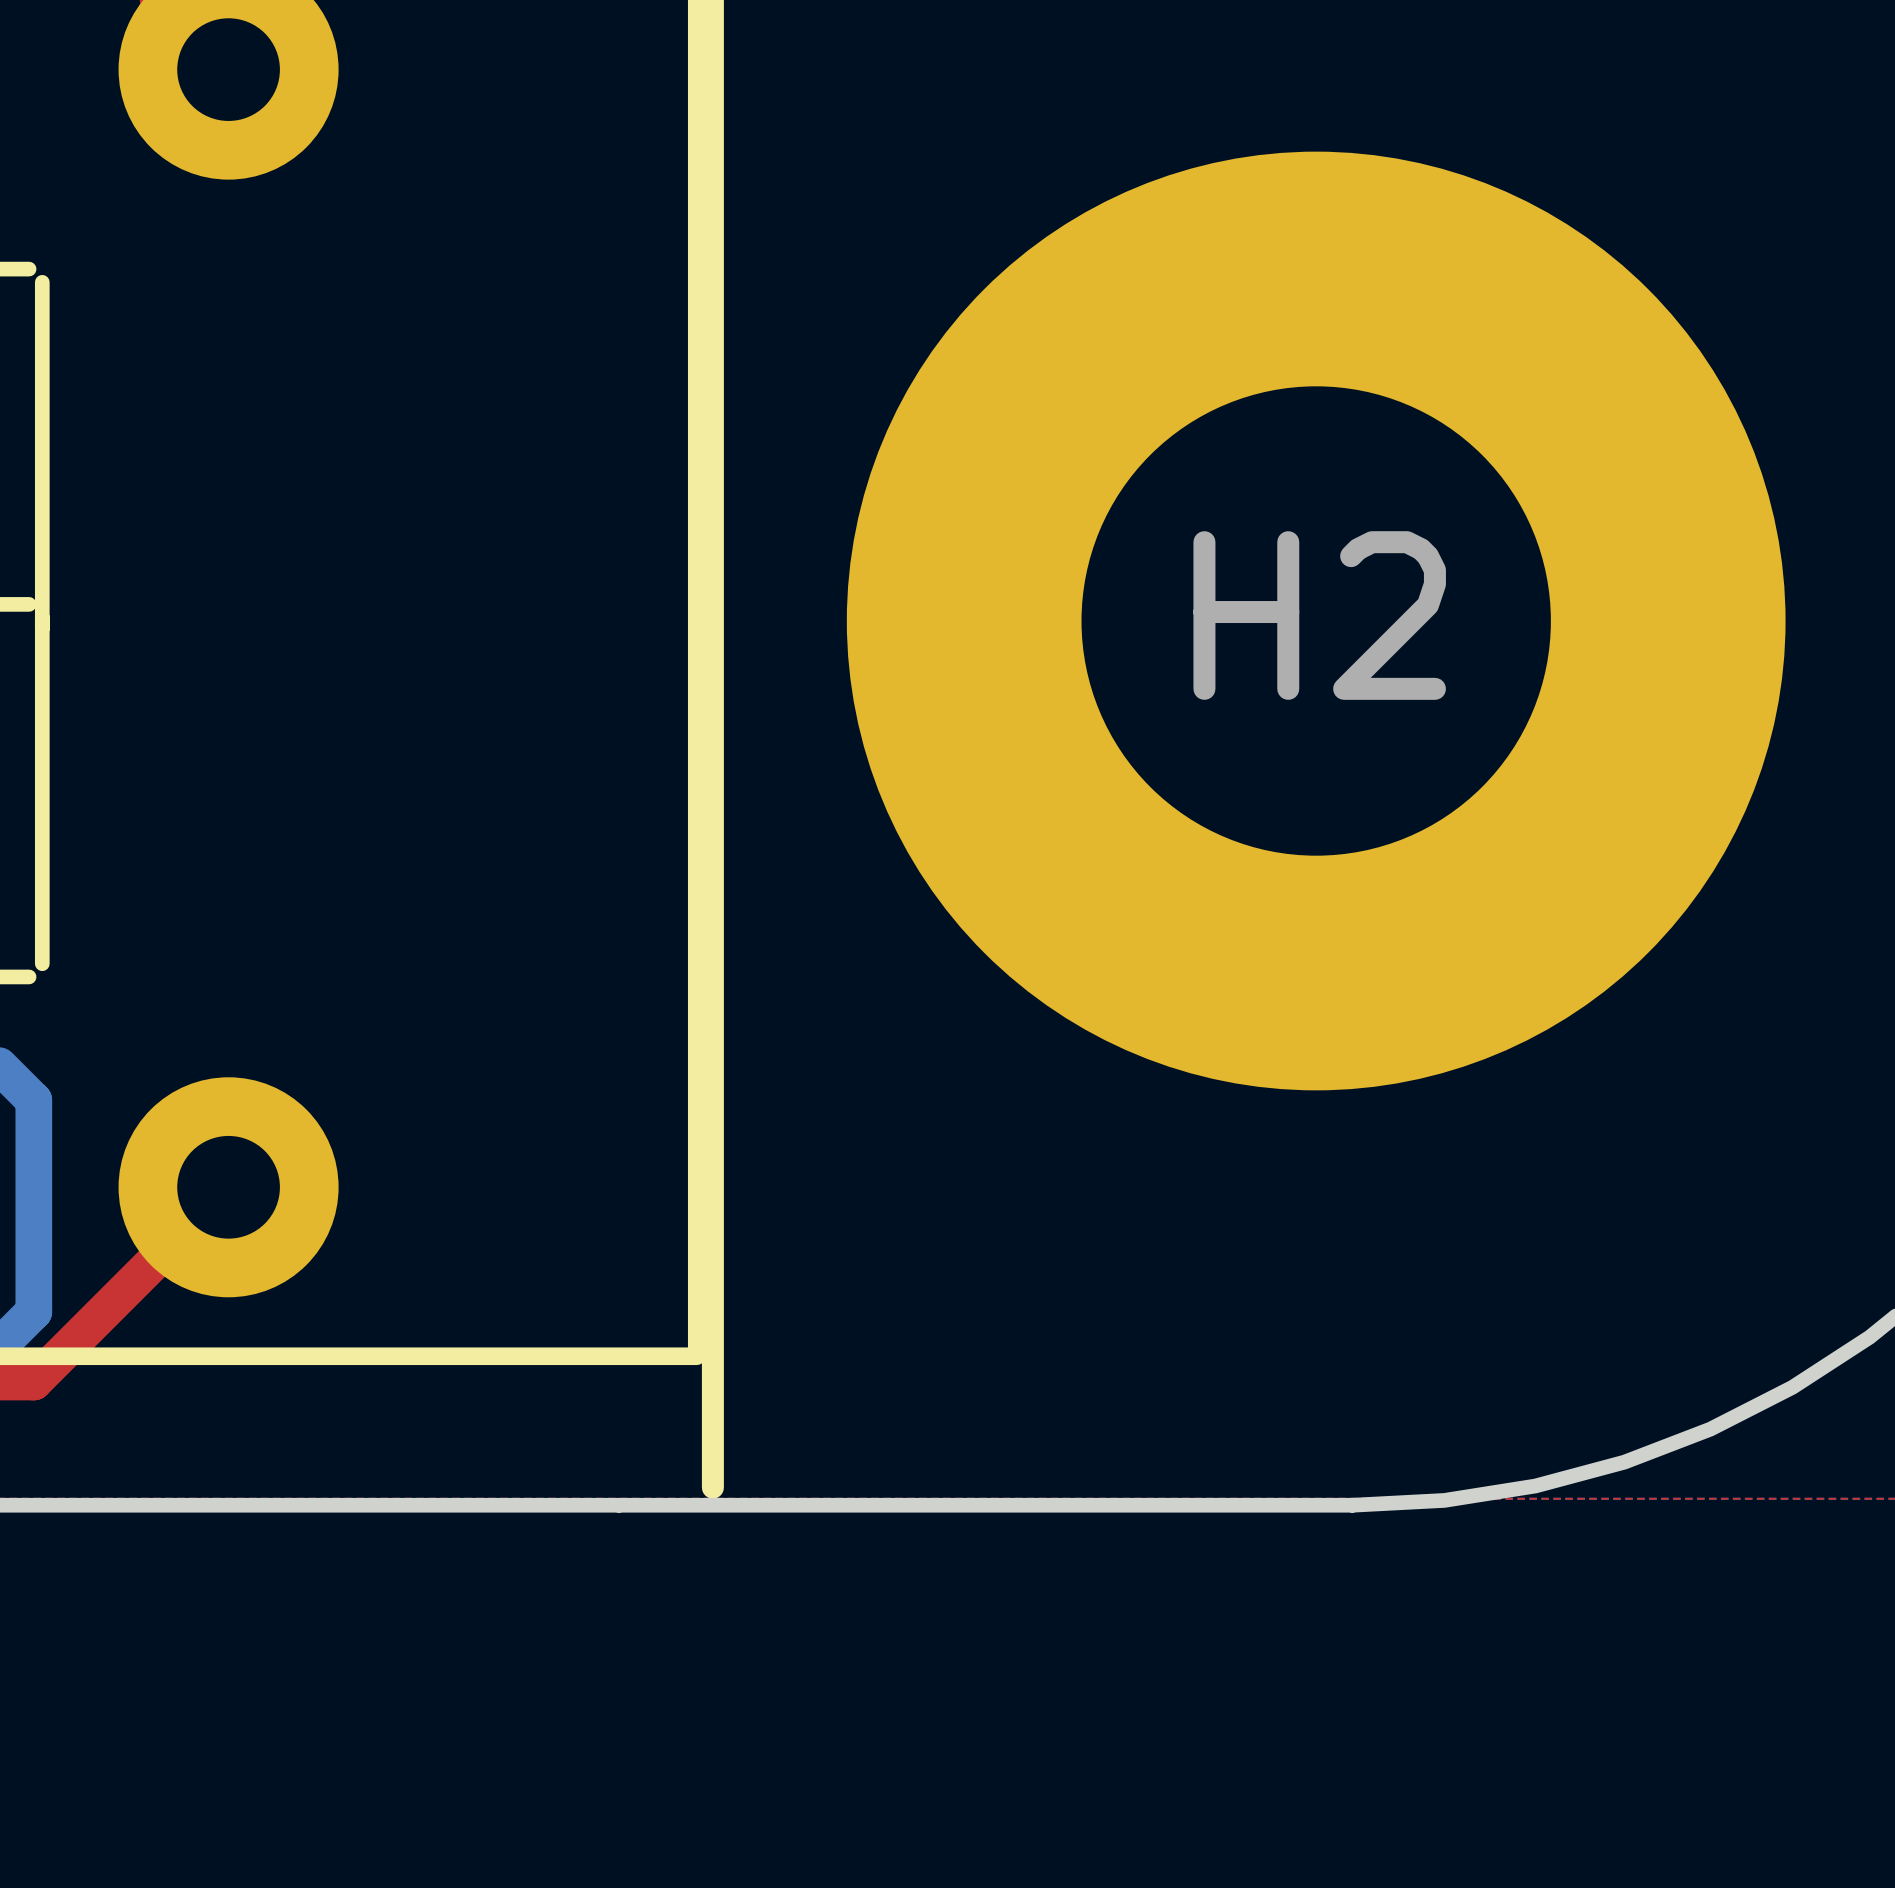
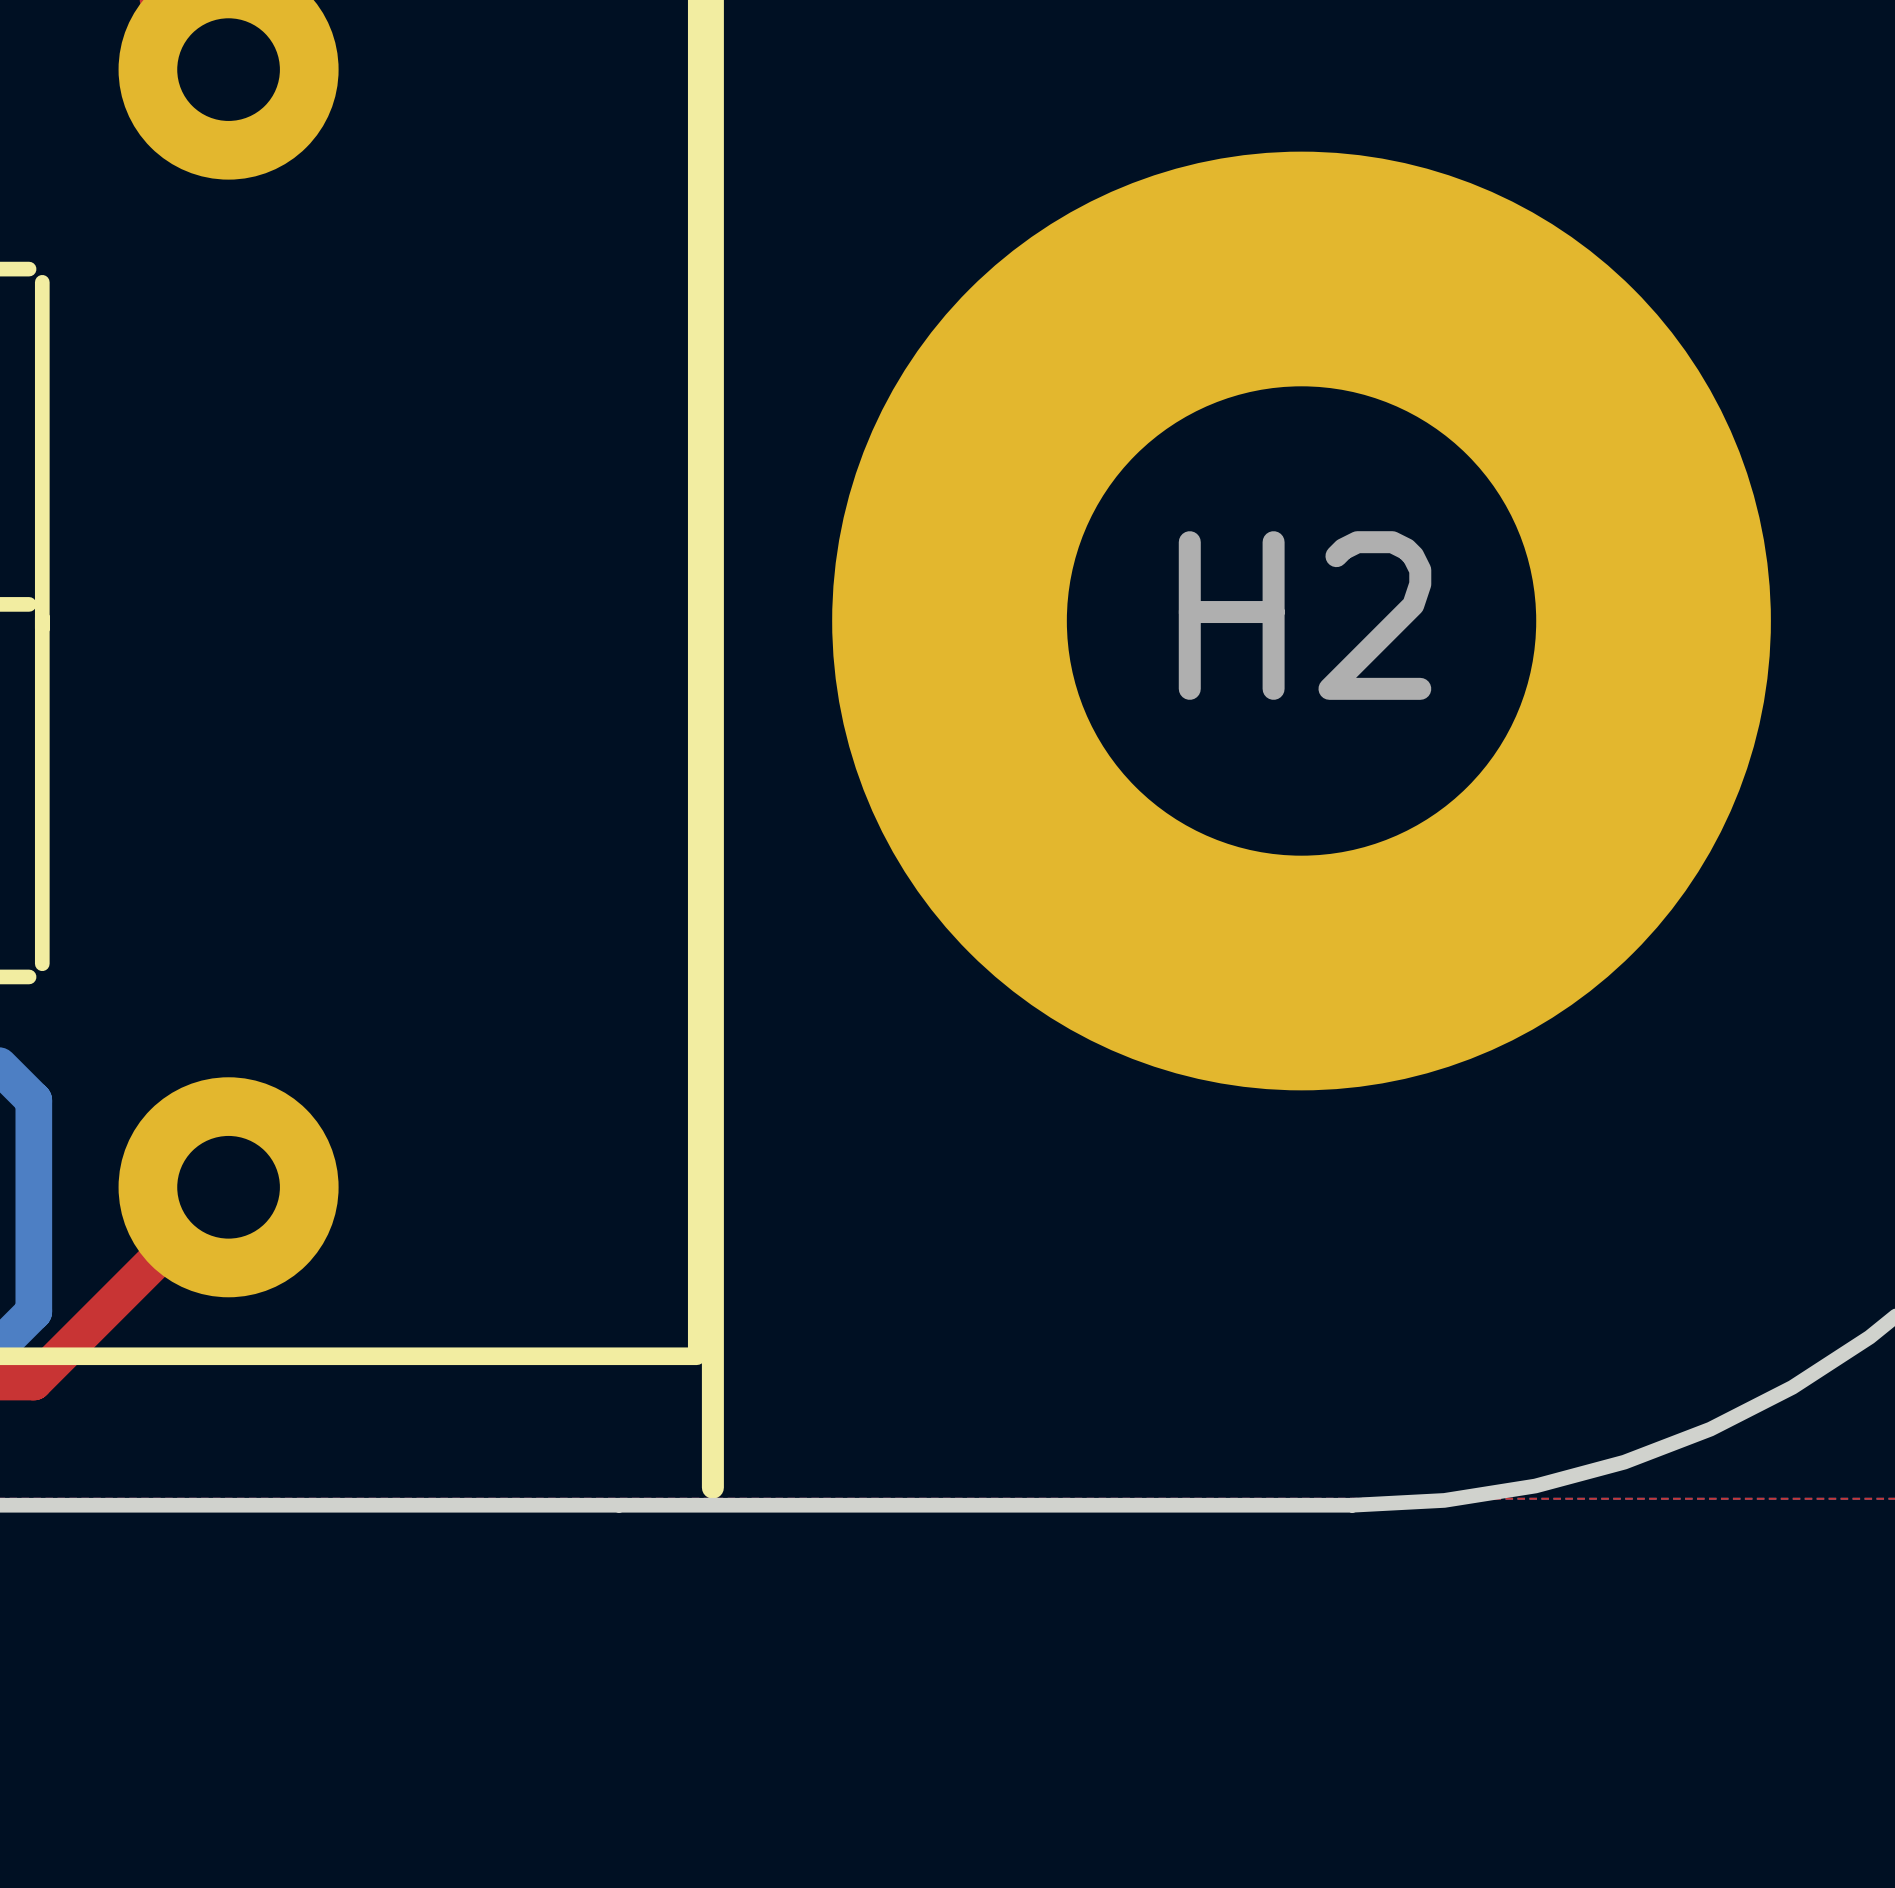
H2 position: (1316, 621) -> (1301, 621)

